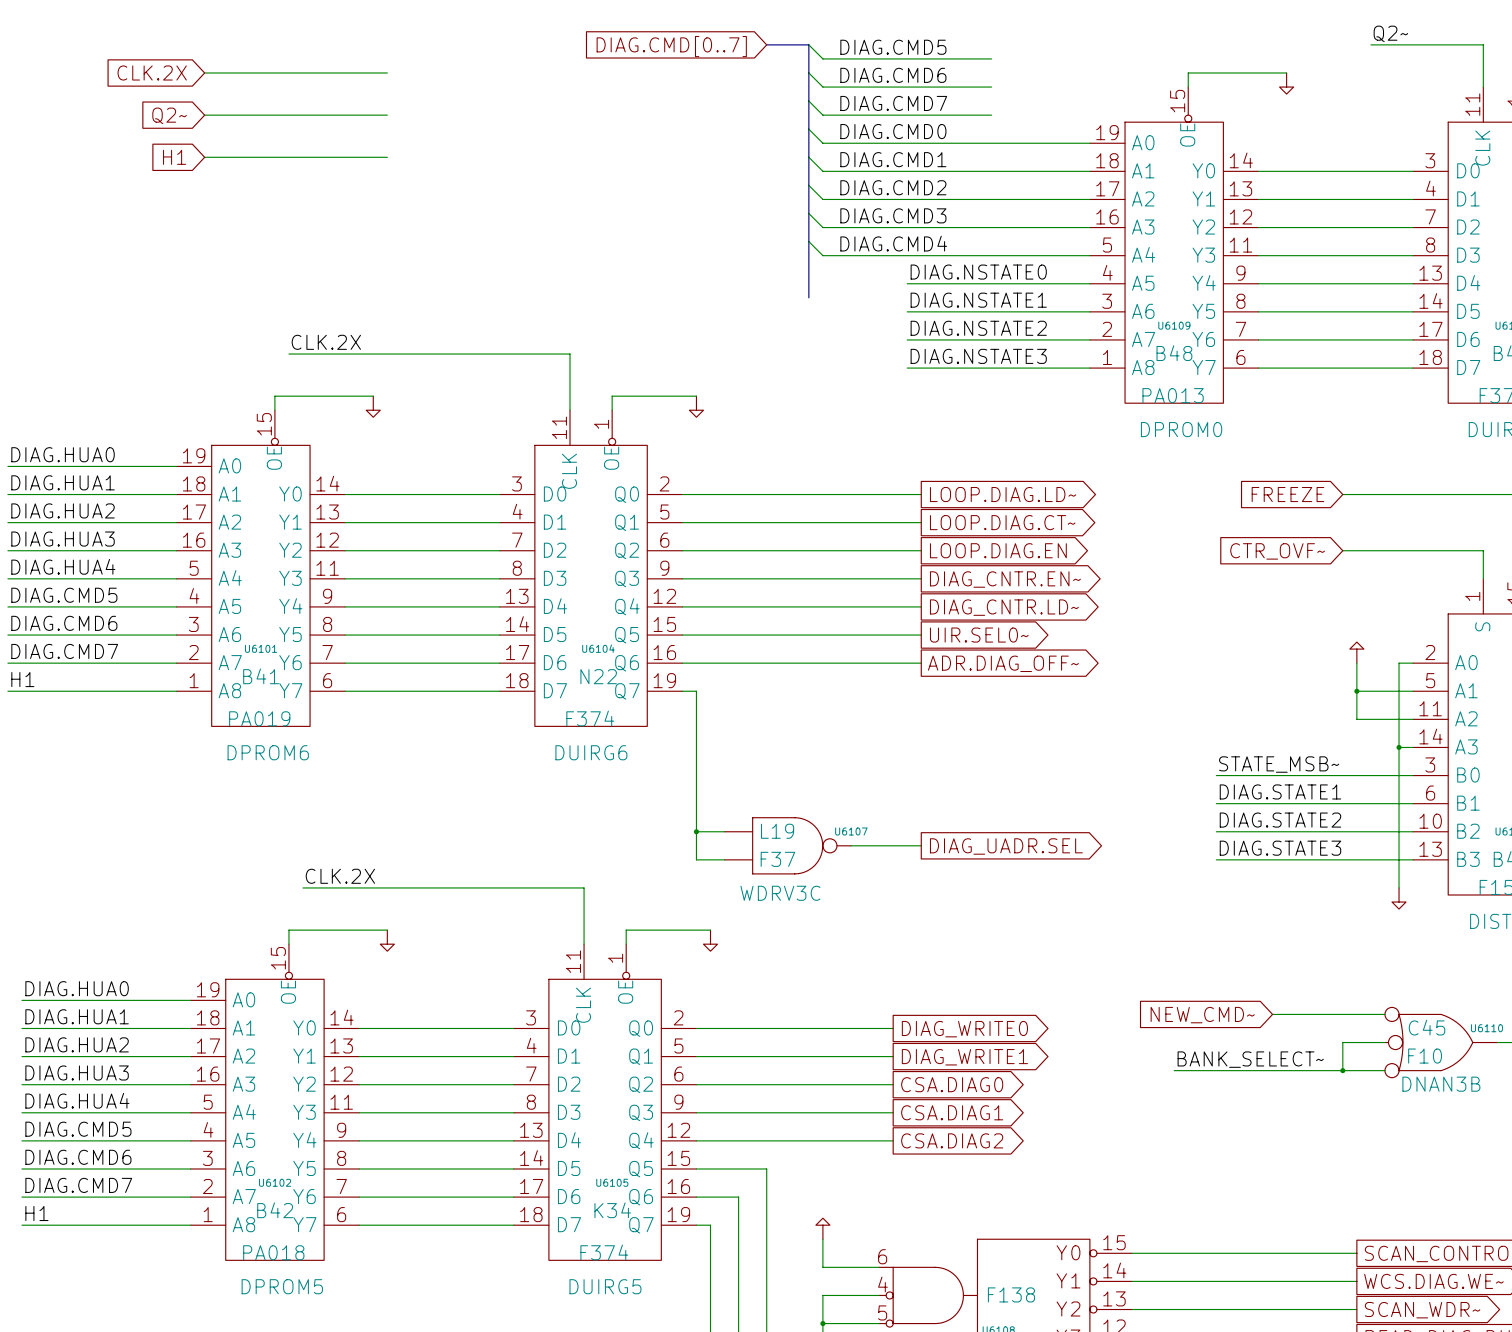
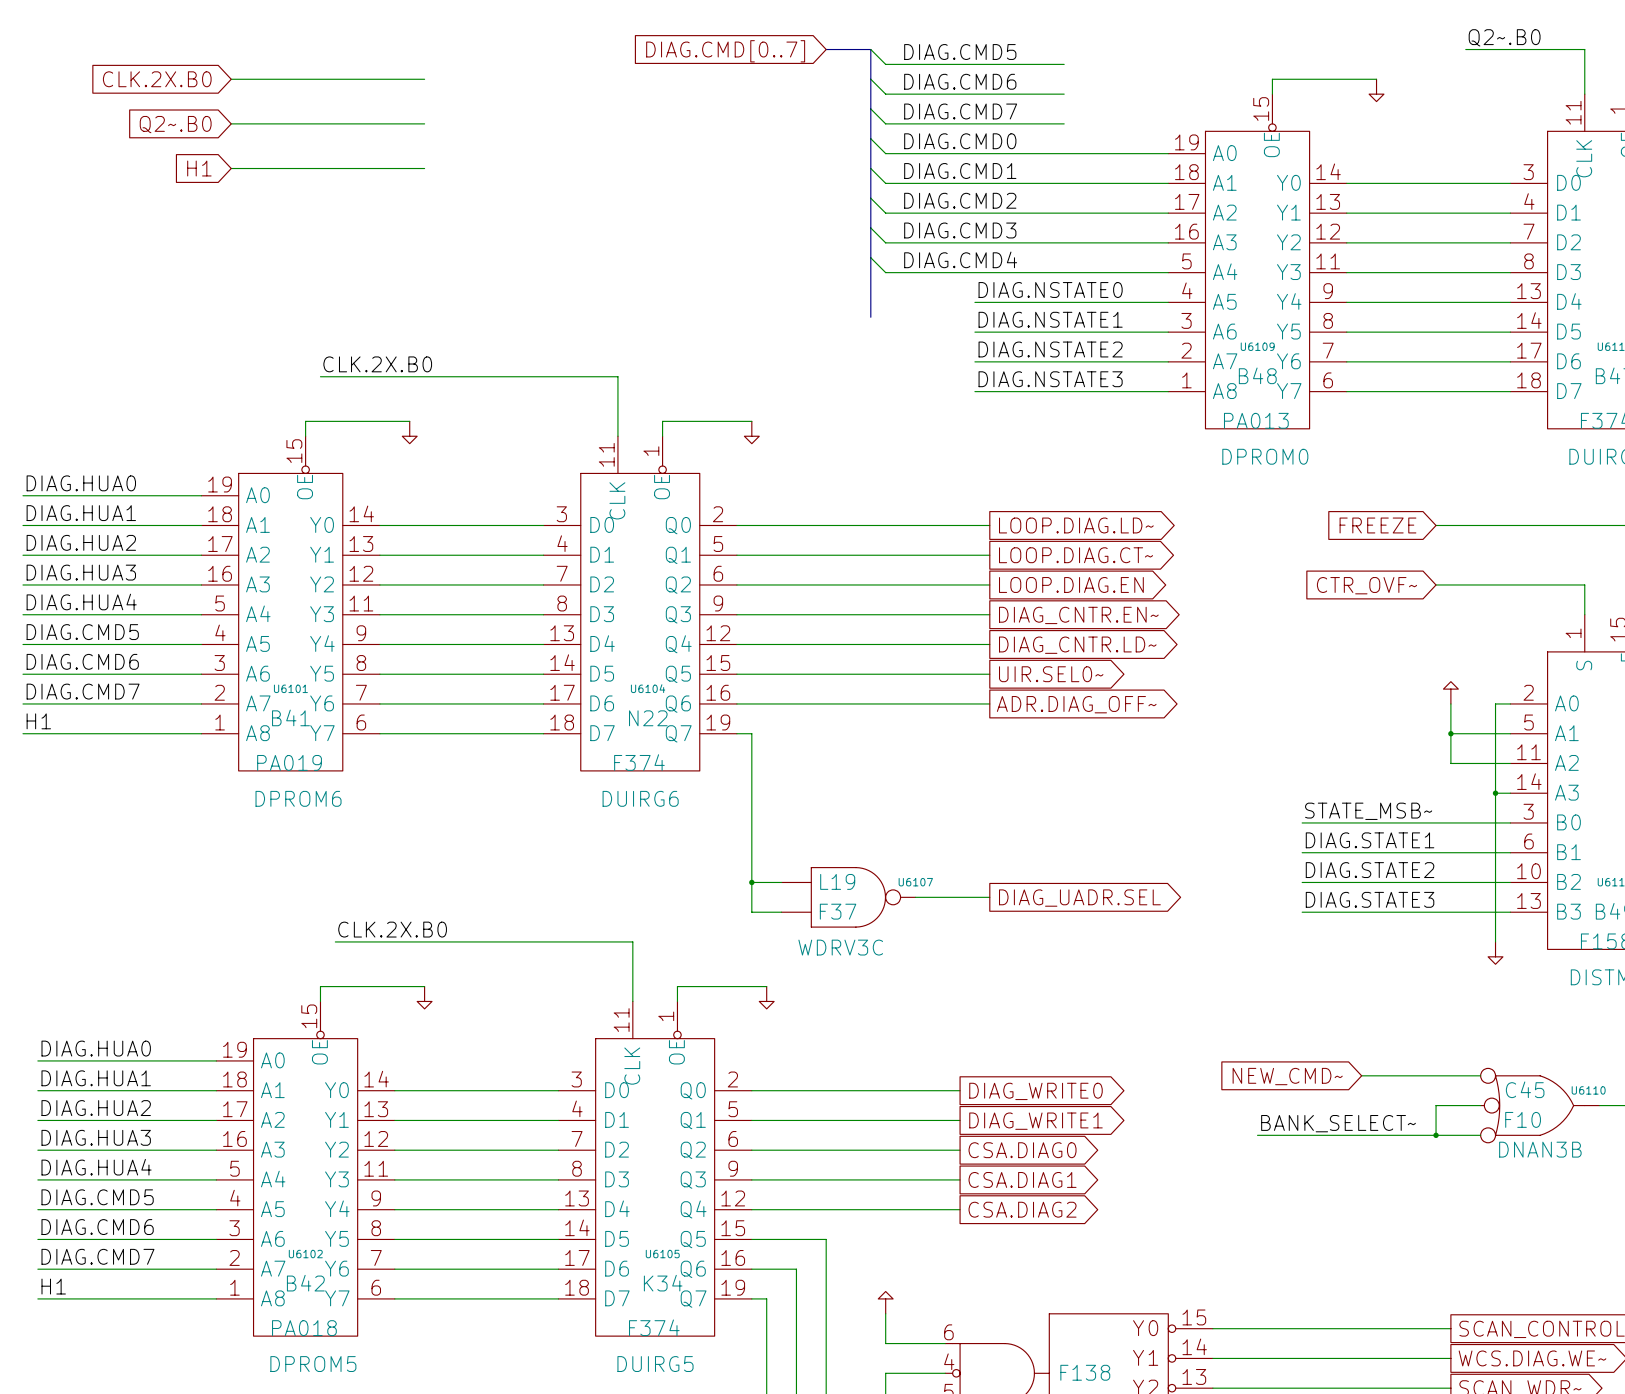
label: Q2~ (1390, 33) -> Q2~.B0 (1504, 37)
global label: CLK.2X (152, 72) -> CLK.2X.B0 (157, 79)
global label: Q2~ (169, 115) -> Q2~.B0 (175, 124)
label: CLK.2X (326, 342) -> CLK.2X.B0 (377, 364)
label: CLK.2X (340, 876) -> CLK.2X.B0 (392, 929)

